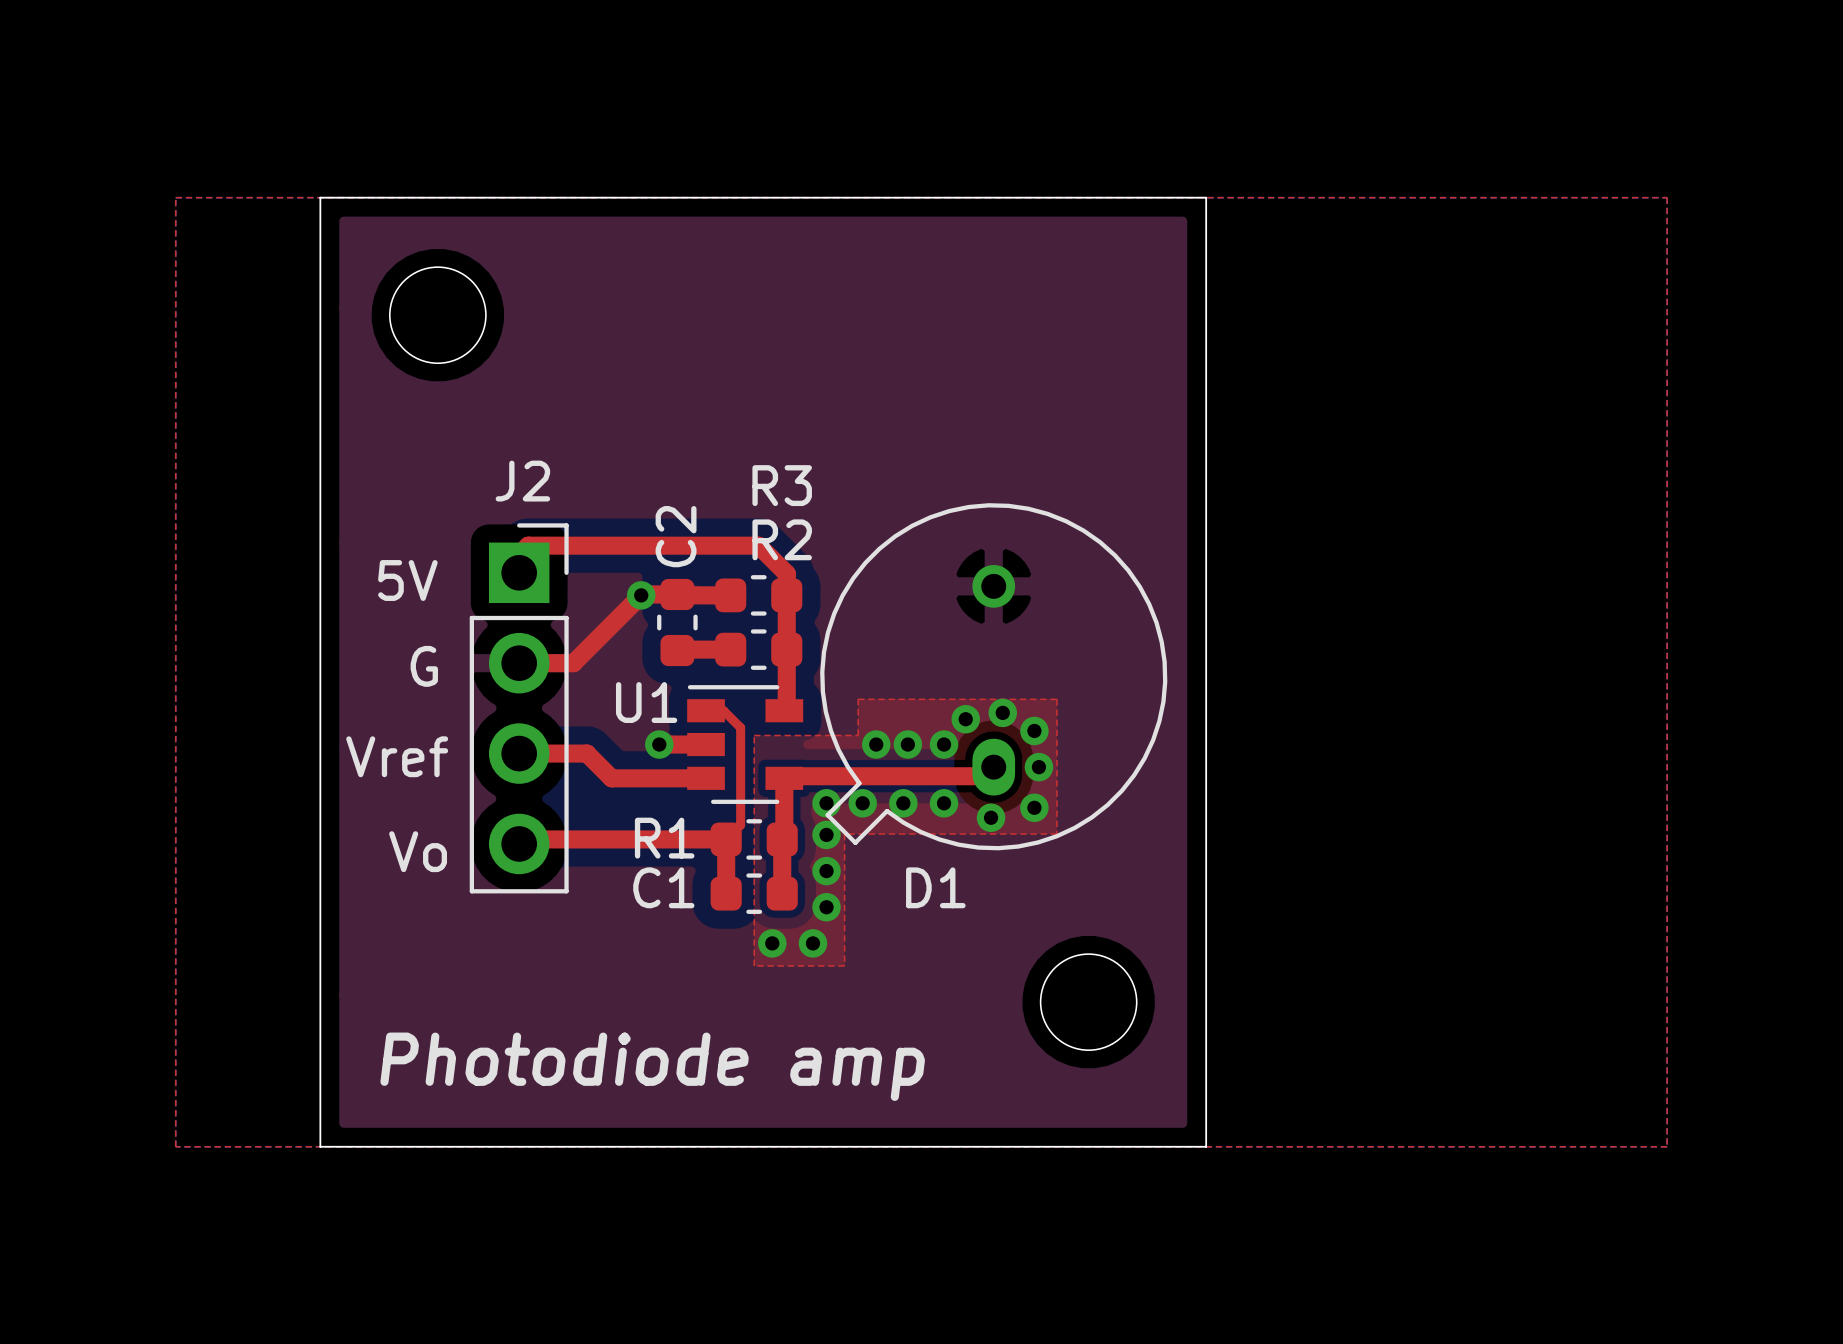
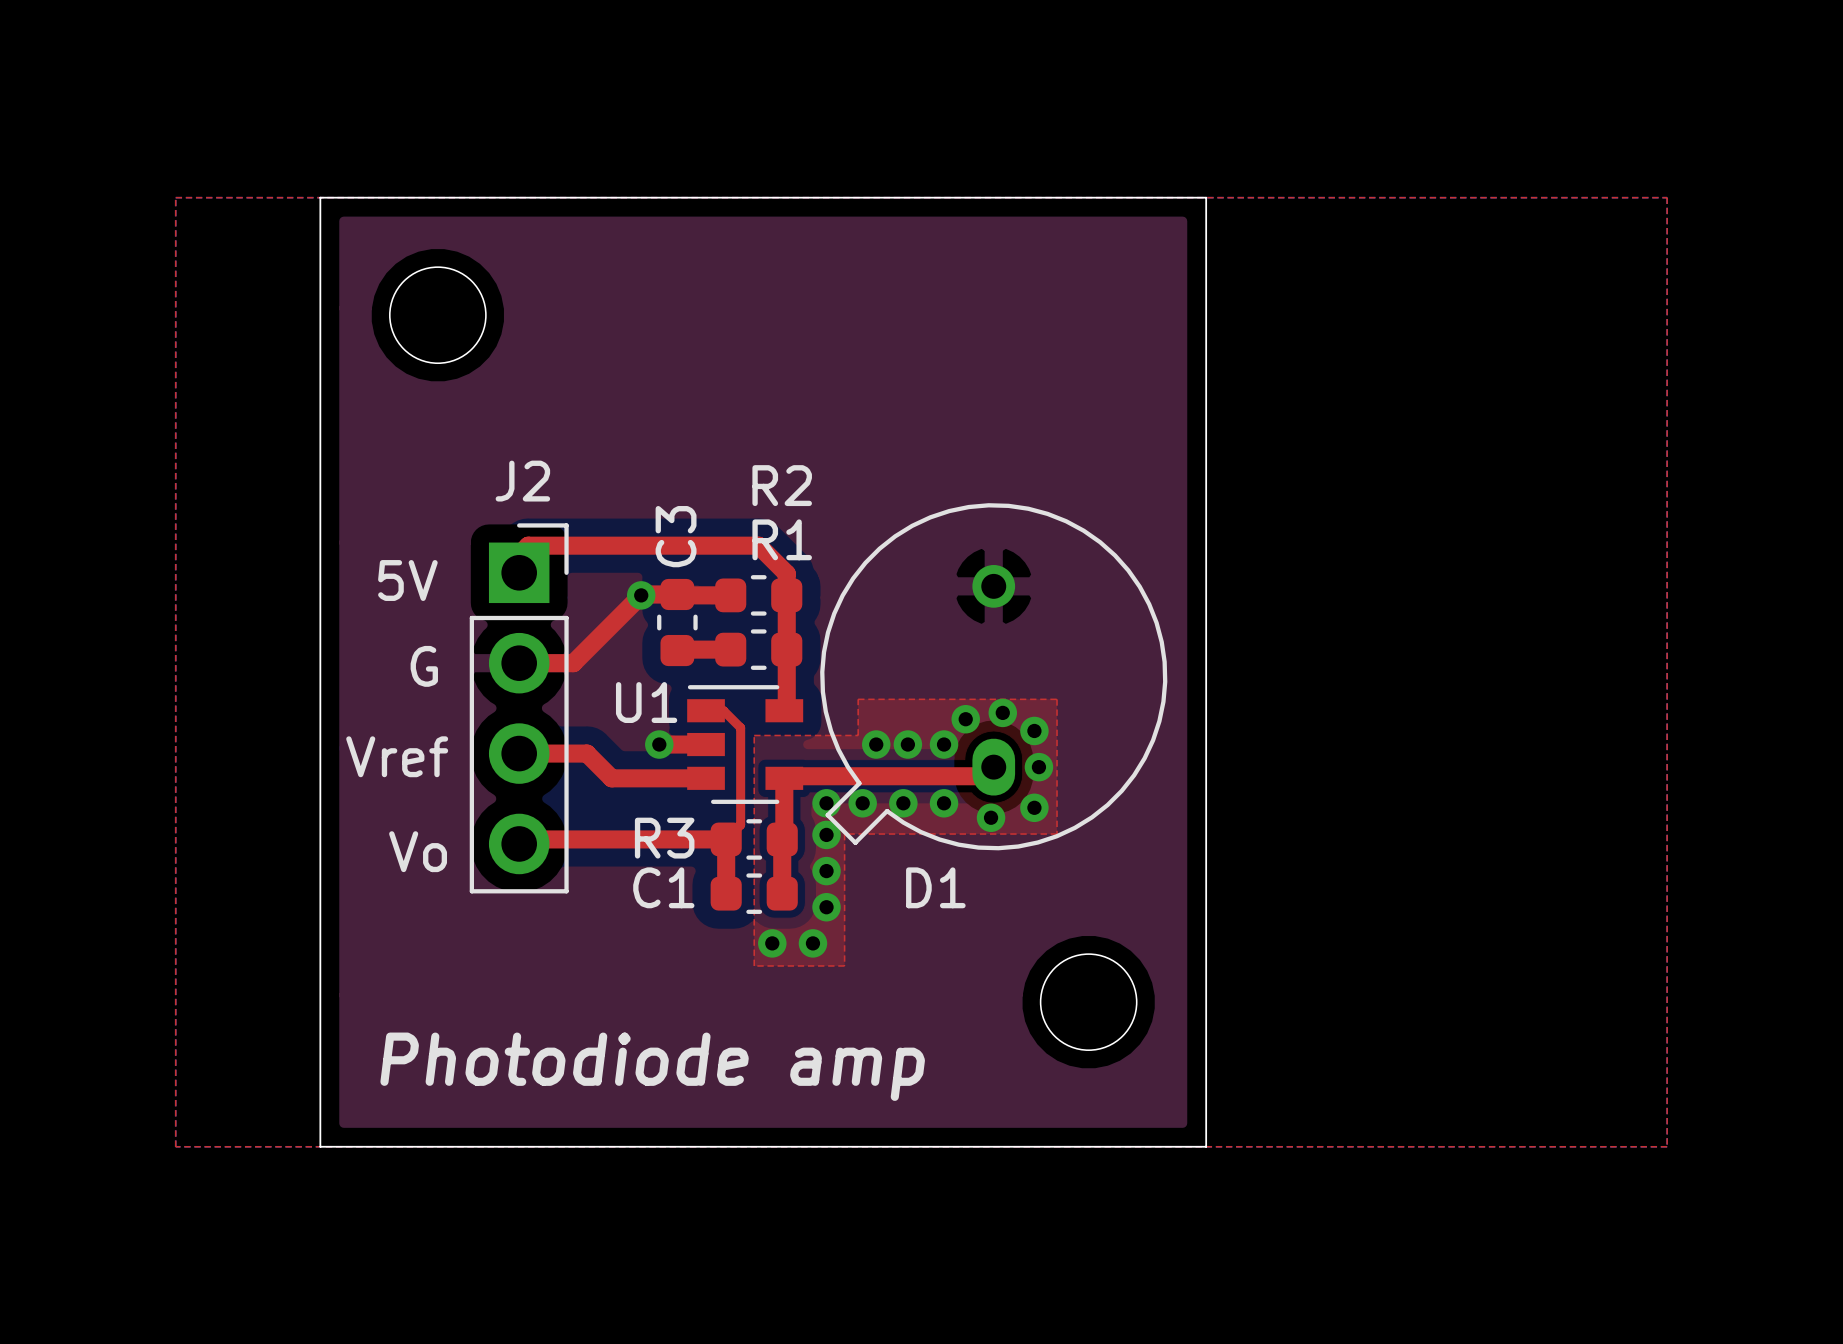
R3 name: R3 (782, 485) -> R2 (782, 485)
C2 name: C2 (676, 536) -> C3 (676, 536)
R2 name: R2 (782, 539) -> R1 (782, 539)
R1 name: R1 (664, 838) -> R3 (664, 838)

